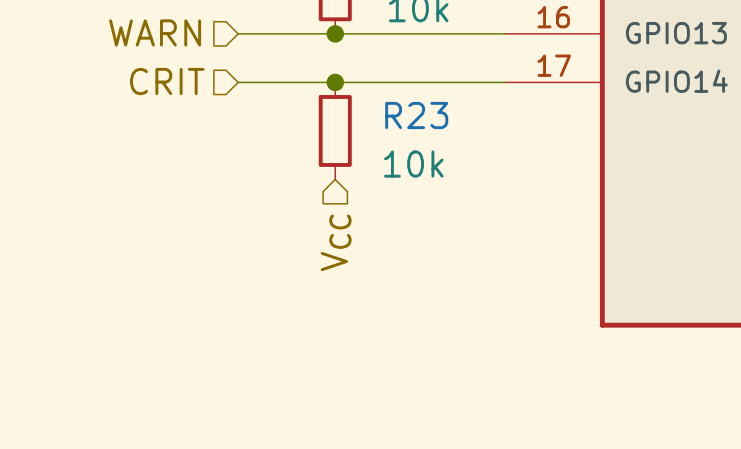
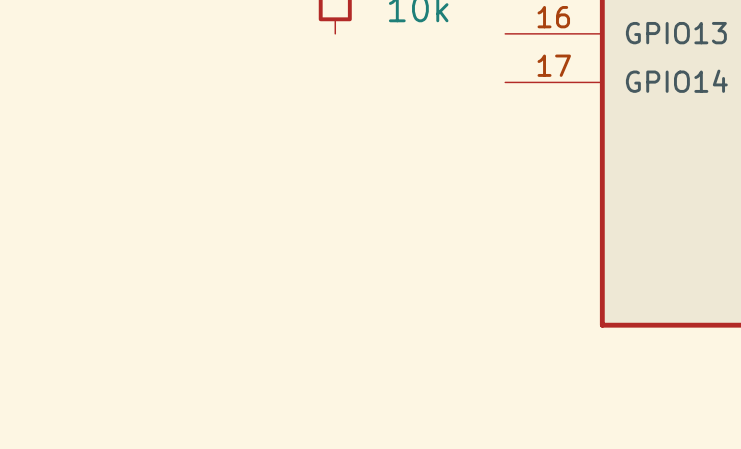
hierarchical label: WARN (155, 32) -> none
wire: (238, 33) (505, 33) -> none
junction: (335, 33) -> none
hierarchical label: CRIT (167, 81) -> none
wire: (238, 82) (505, 82) -> none
junction: (335, 82) -> none
R23: 10k (335, 130) -> none
hierarchical label: VCC (336, 242) -> none

